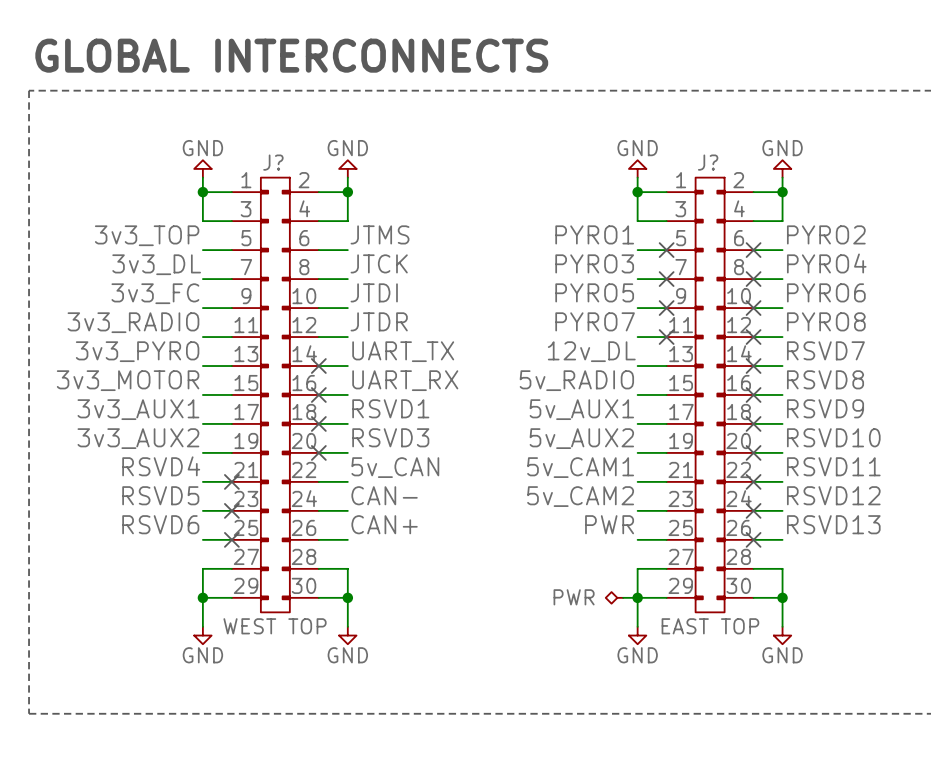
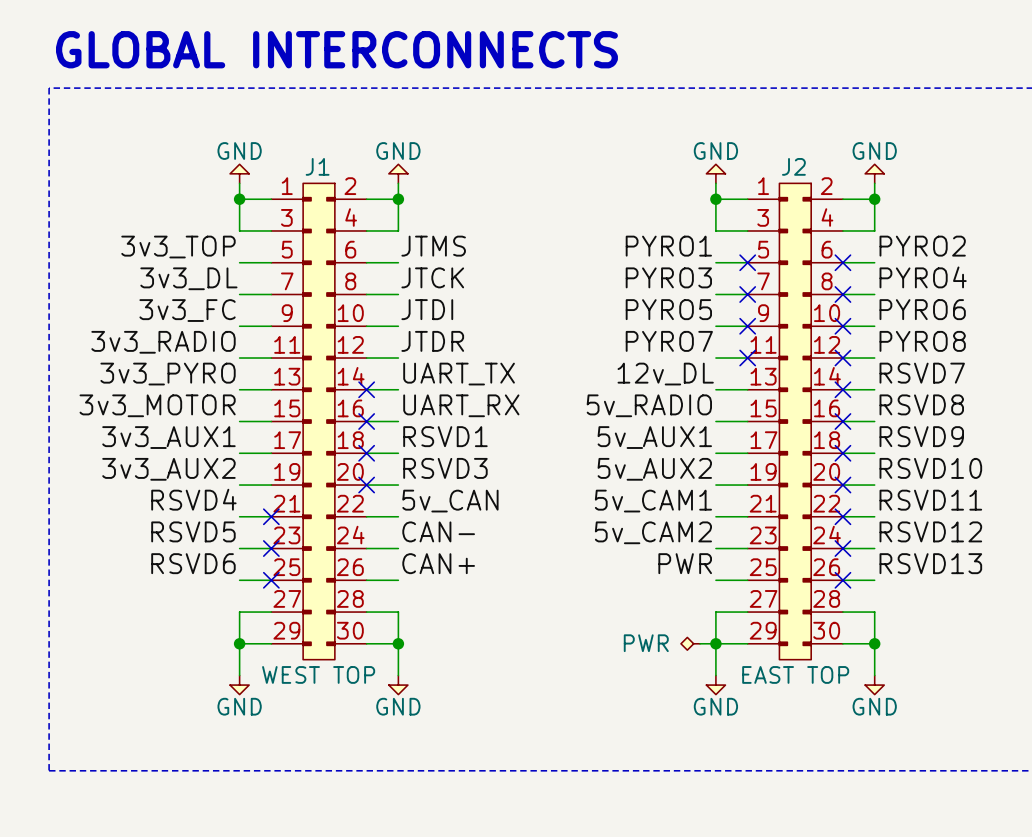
J? name: J? (273, 162) -> J1 (317, 166)
J? name: J? (708, 162) -> J2 (793, 166)

